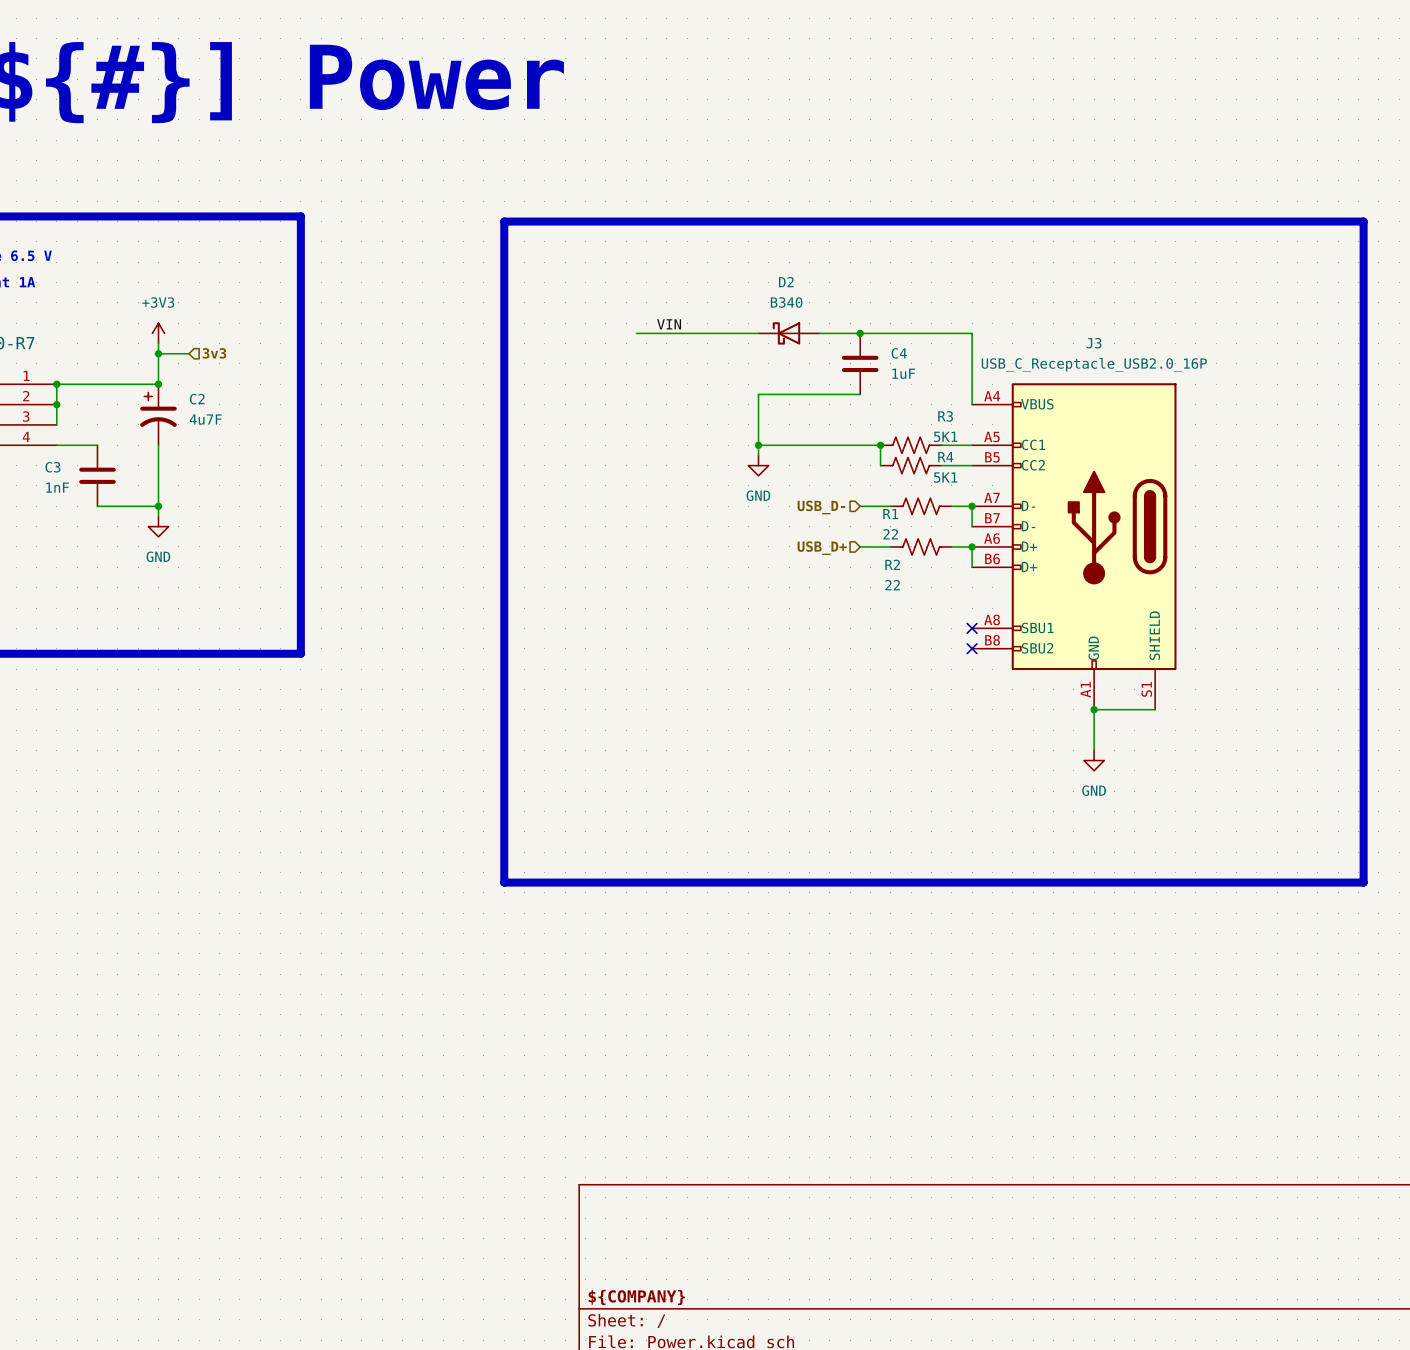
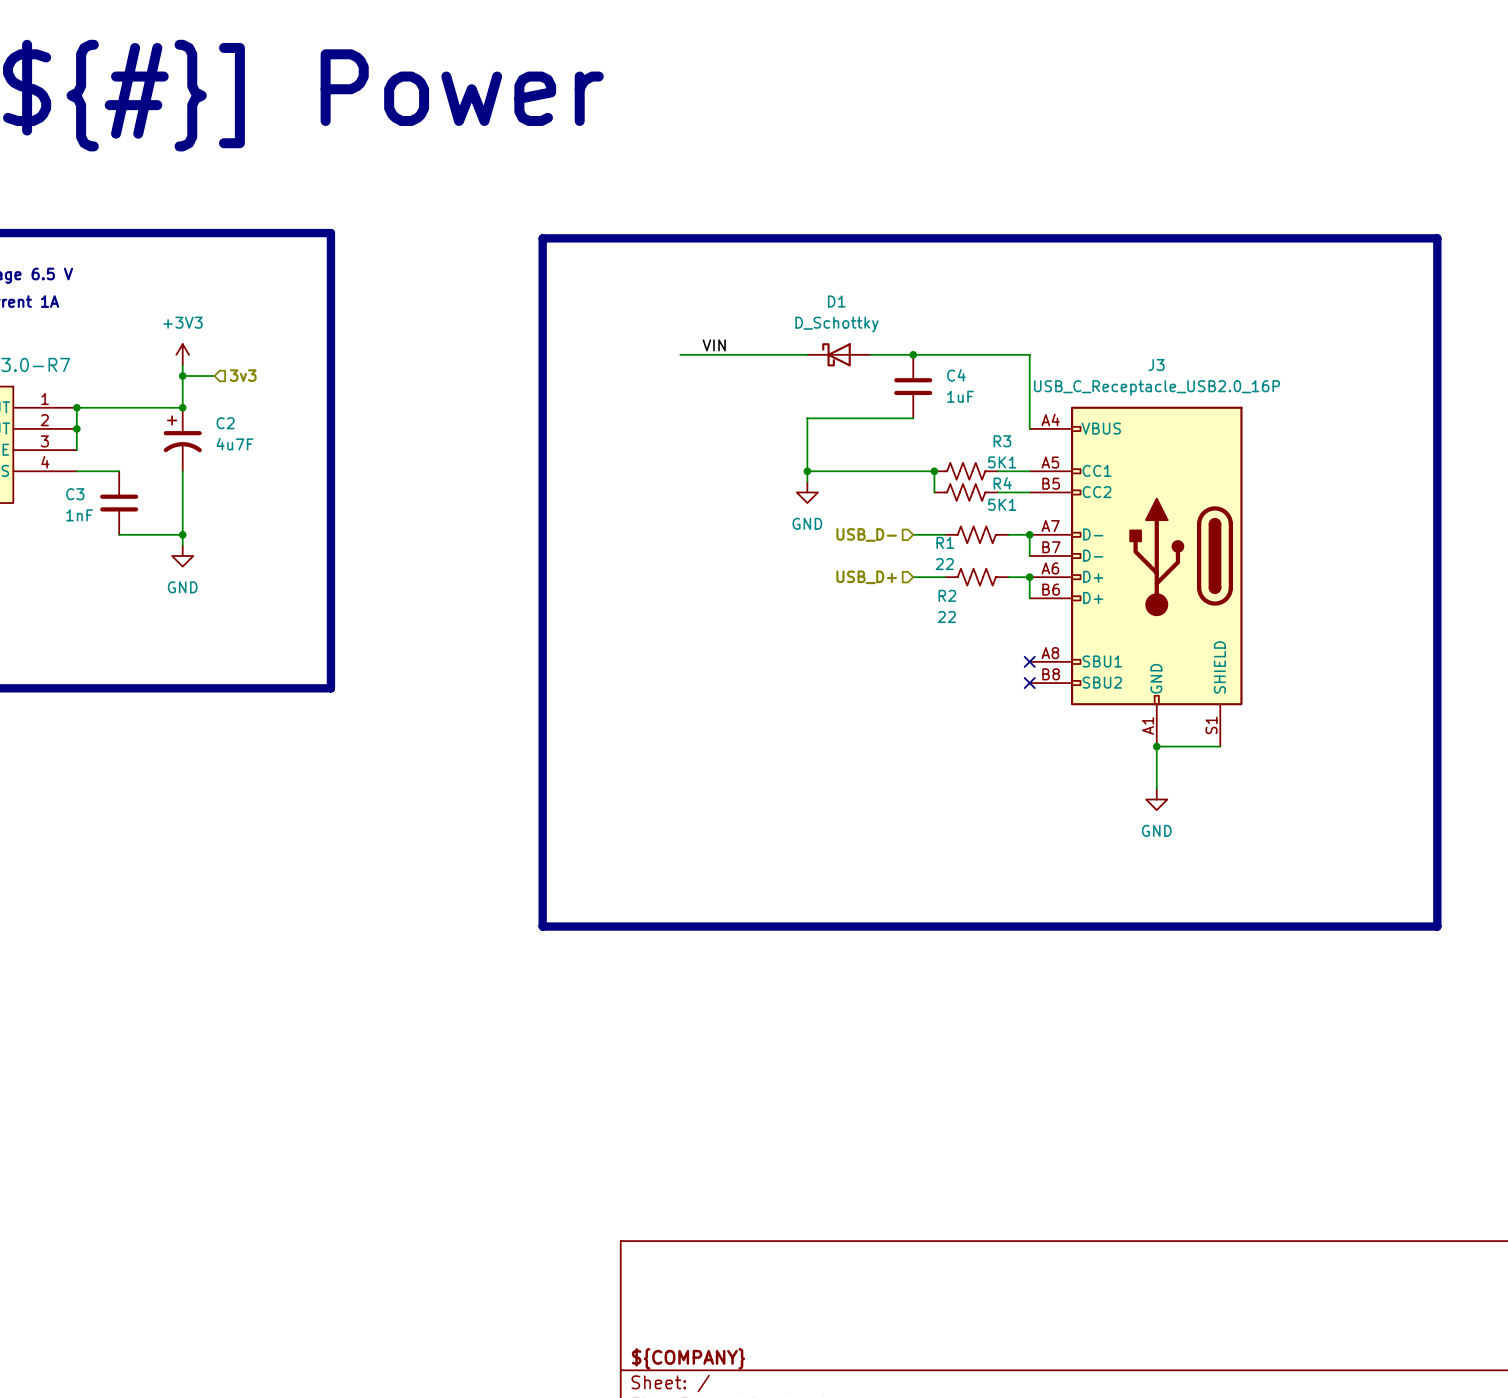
D2 name: D2 (786, 282) -> D1 (836, 301)
D2 value: B340 (786, 302) -> D_Schottky (836, 324)

